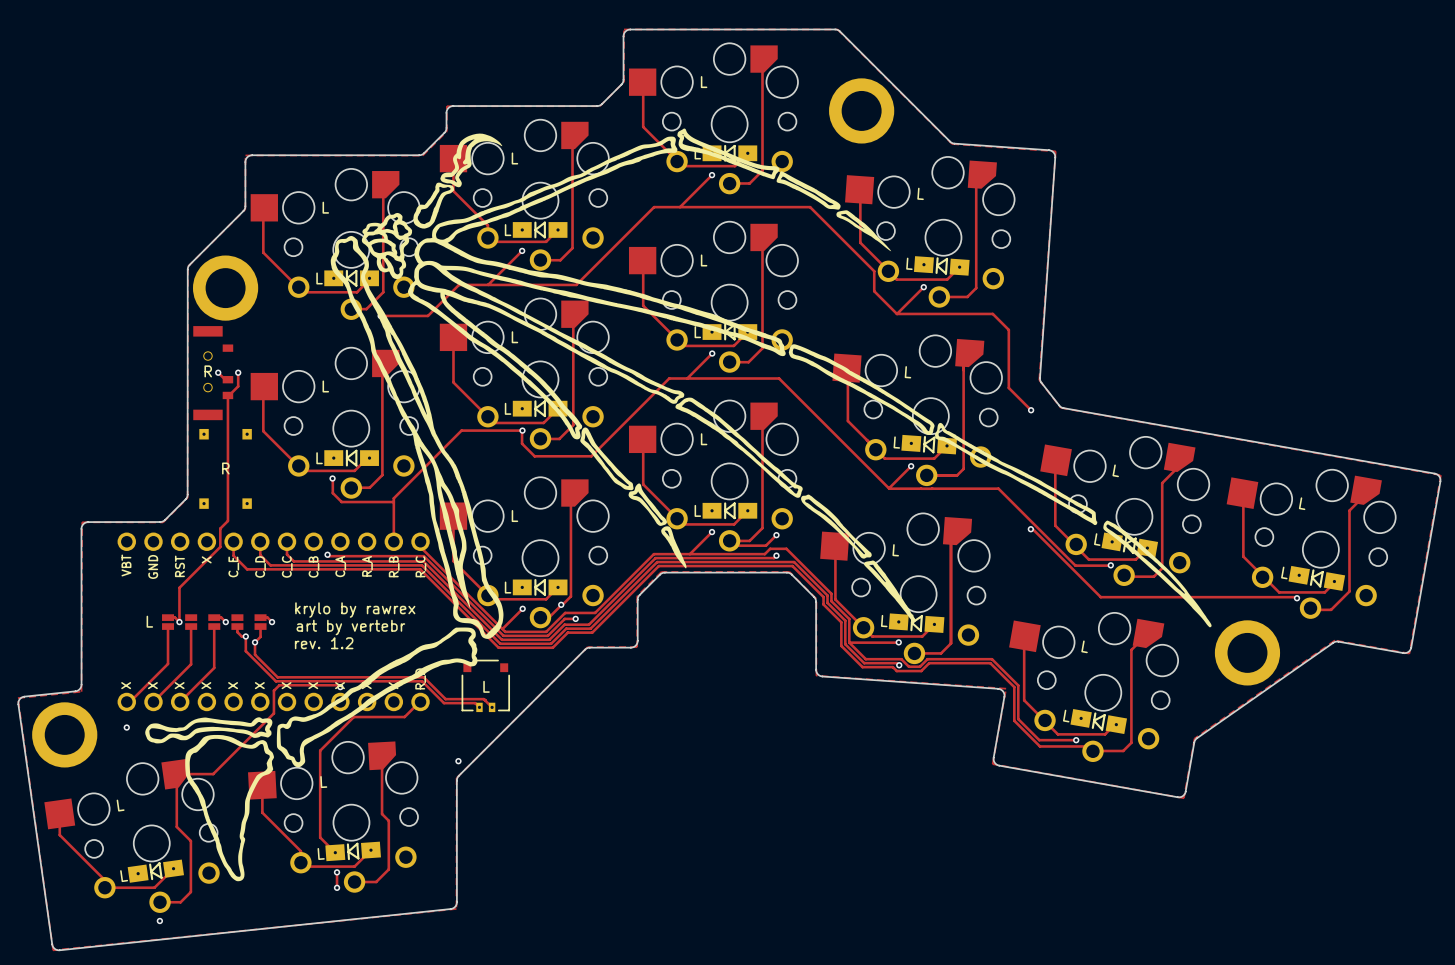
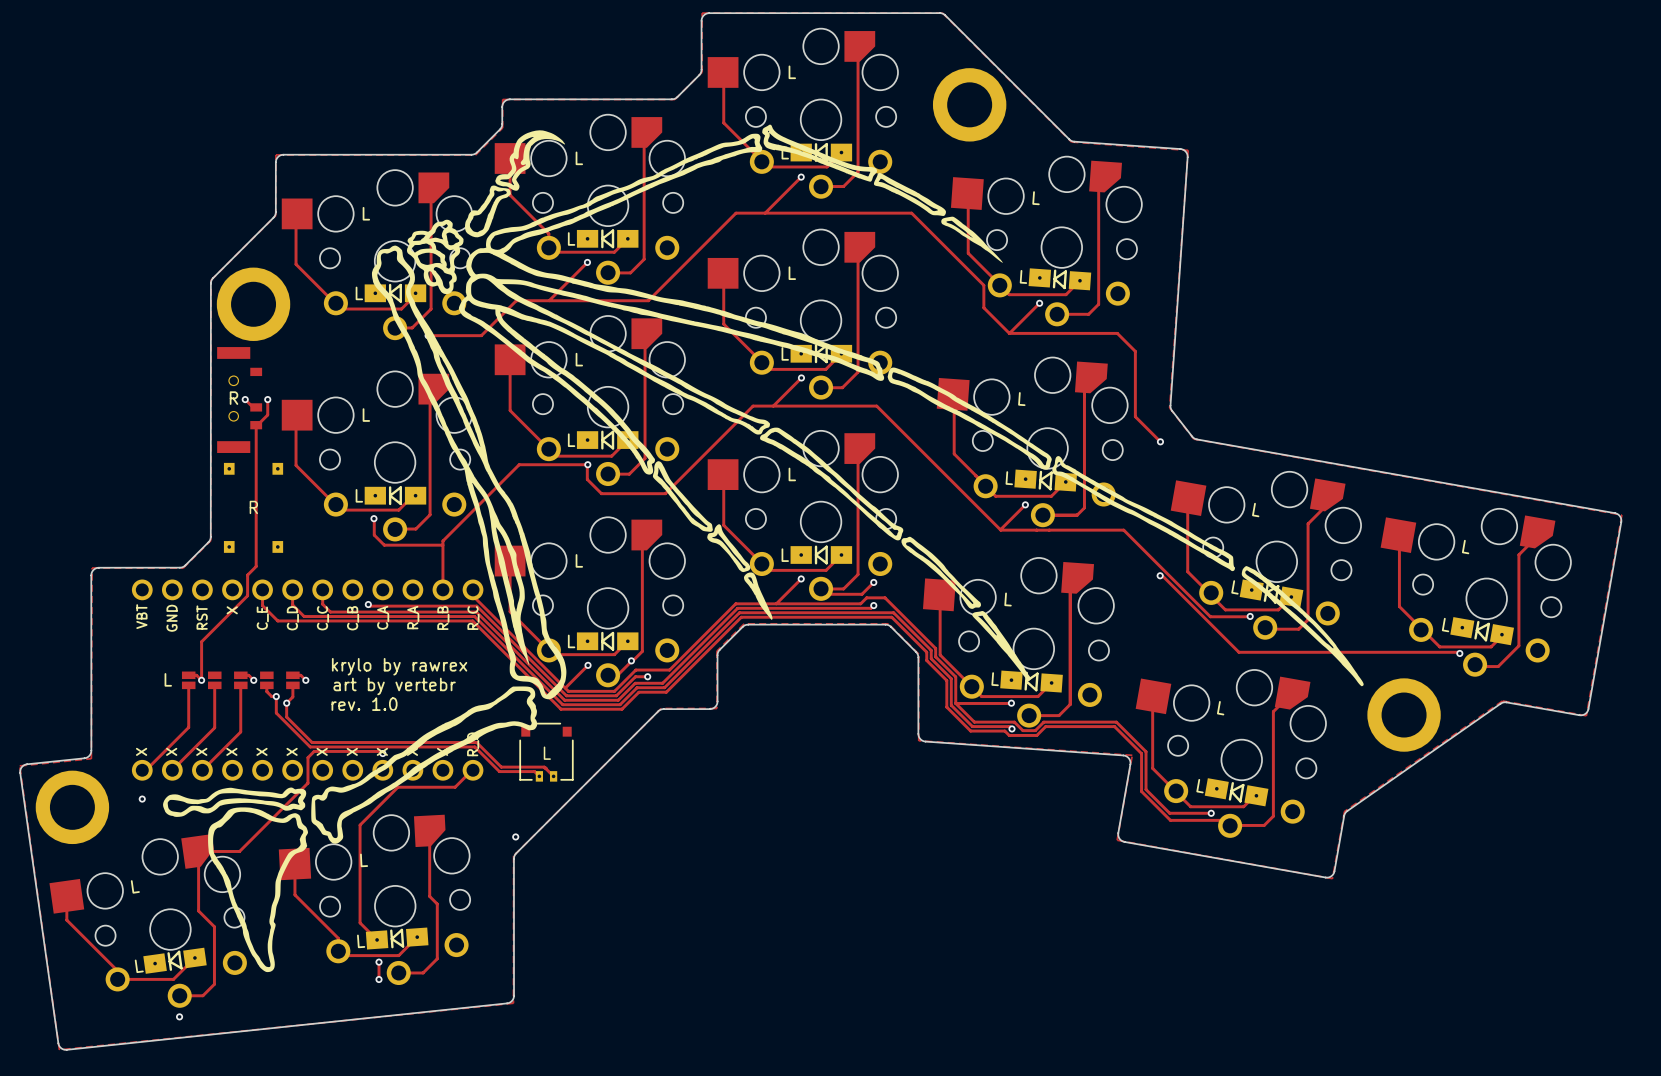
drawing shape: [294, 602, 416, 650] -> [331, 657, 468, 711]

